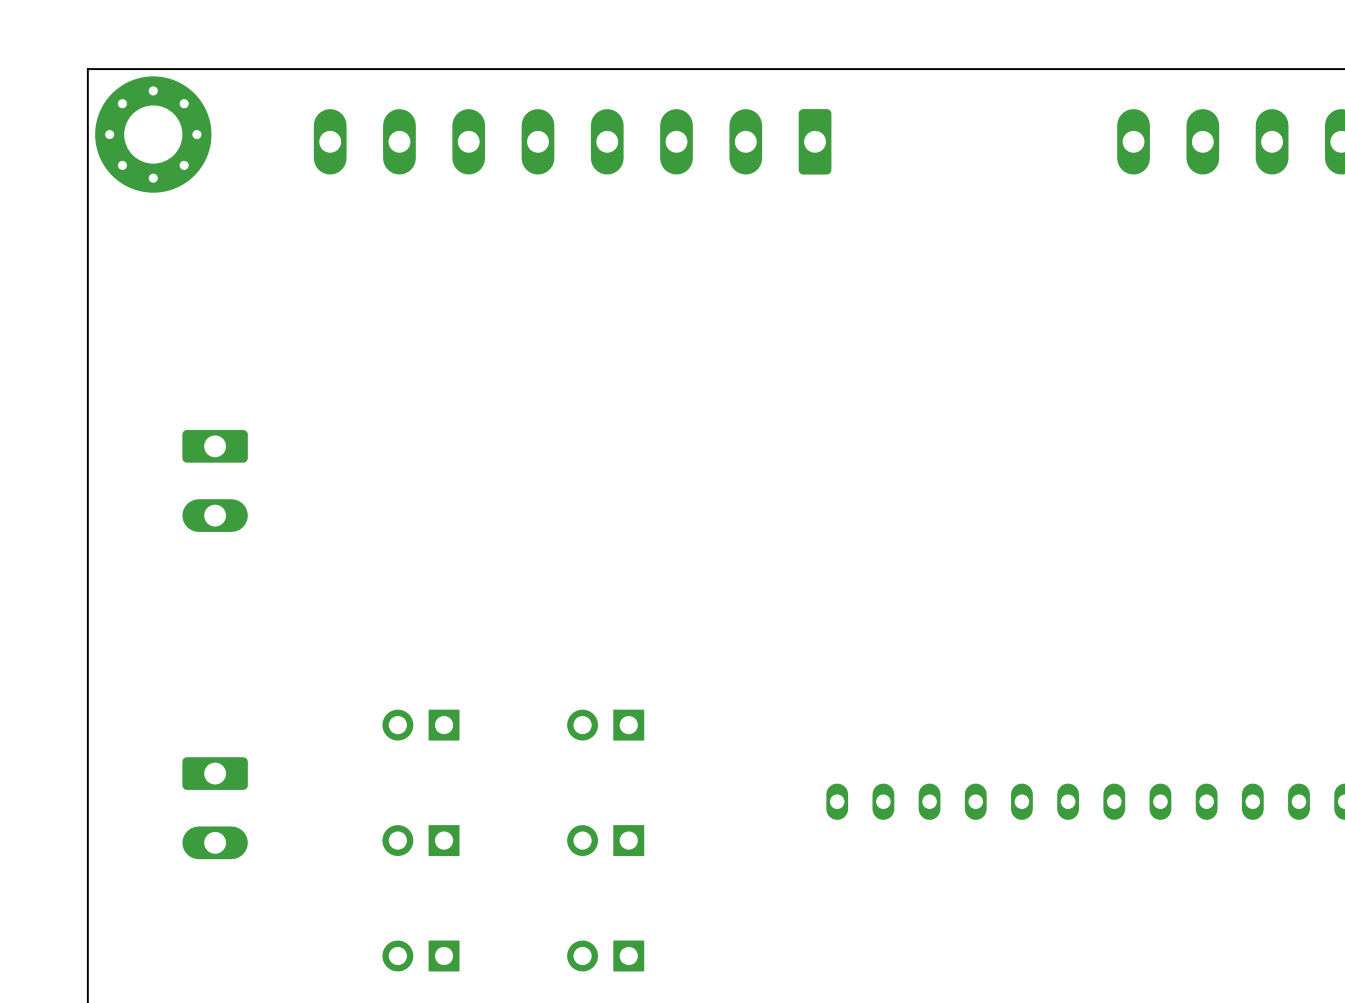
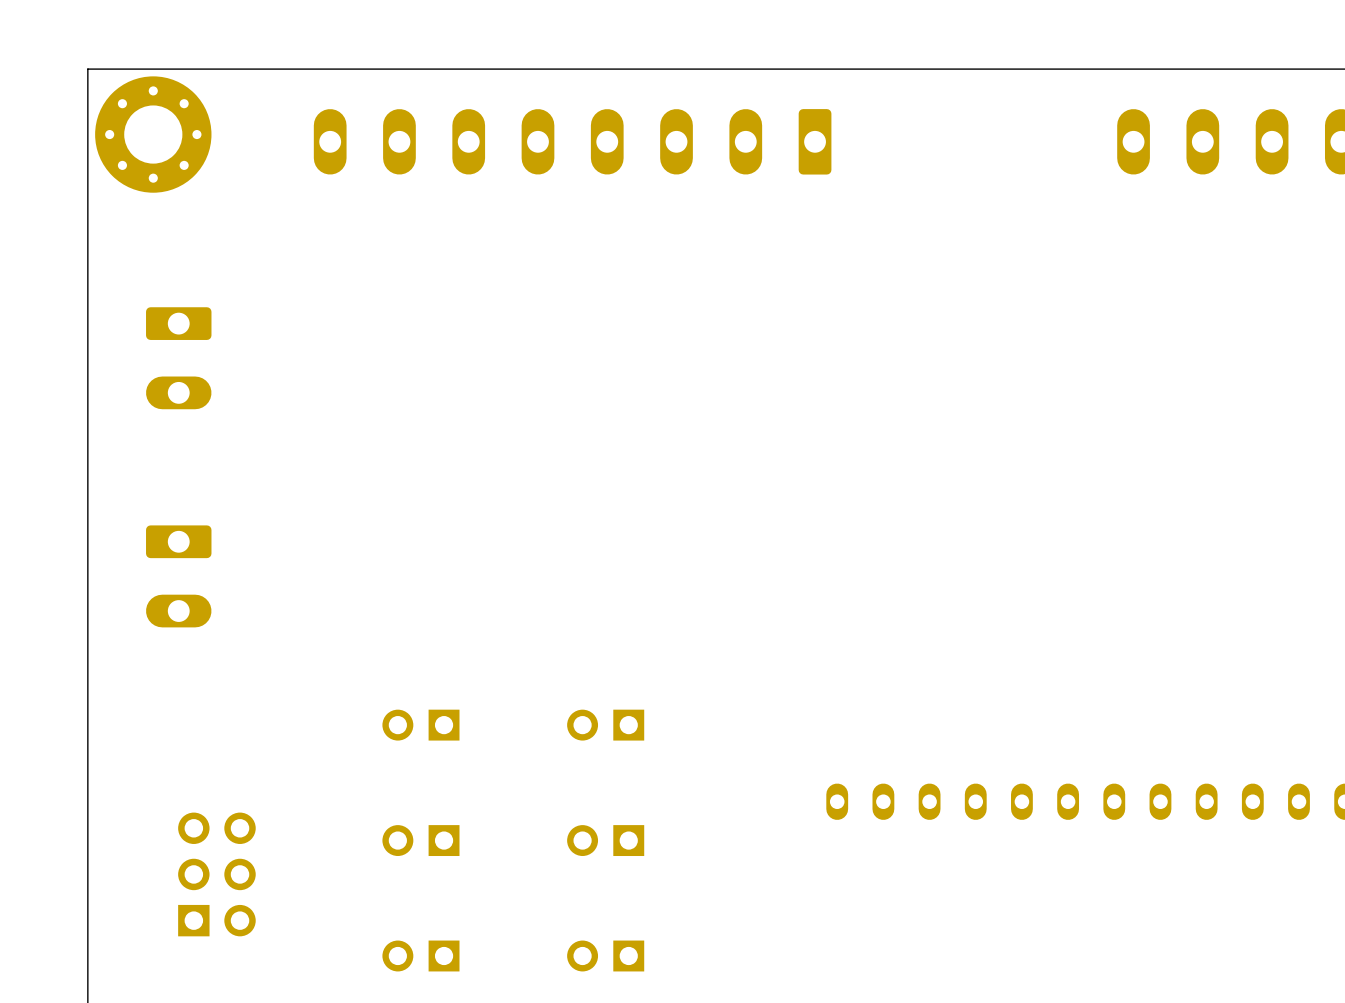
part: none -> (178, 358)
part: (215, 480) -> none
part: none -> (178, 576)
part: (215, 808) -> none
part: none -> (216, 874)

